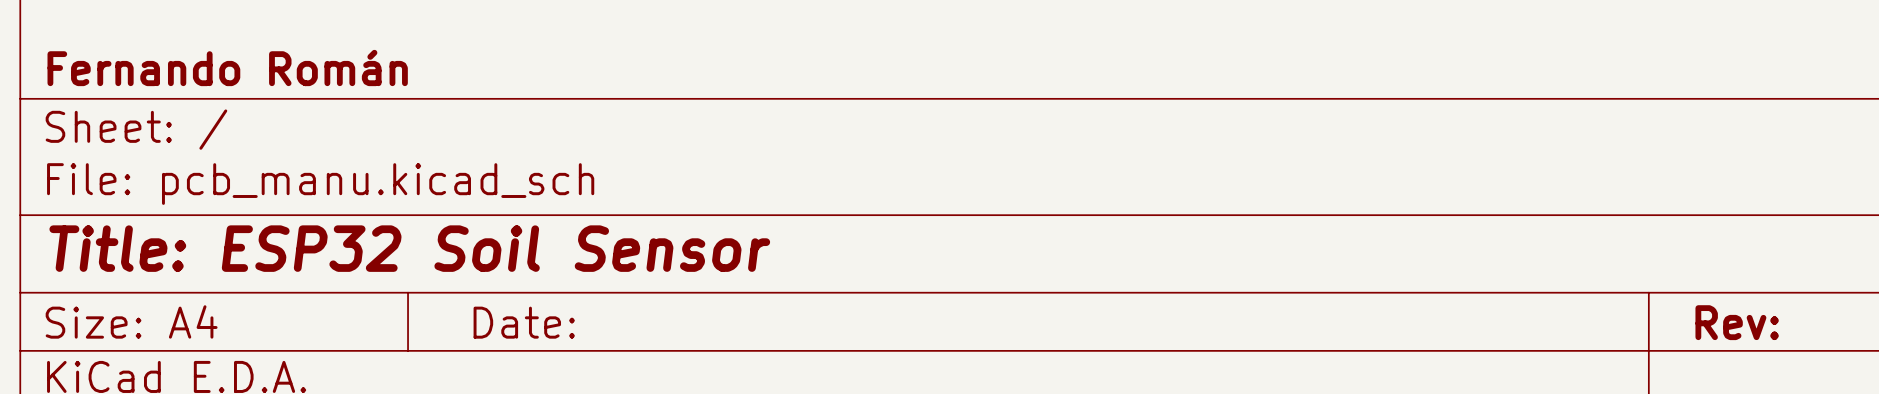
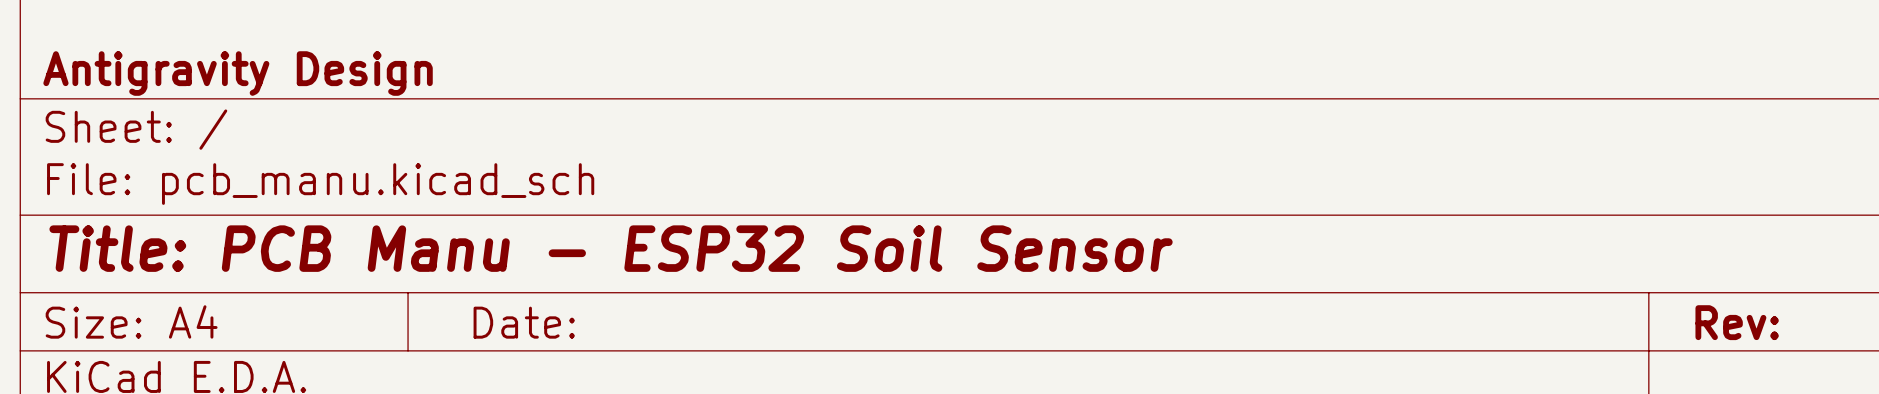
title block: Fernando Román (227, 67) -> Antigravity Design (238, 73)
title block: Title: ESP32 Soil Sensor (409, 248) -> Title: PCB Manu - ESP32 Soil Sensor (611, 248)

